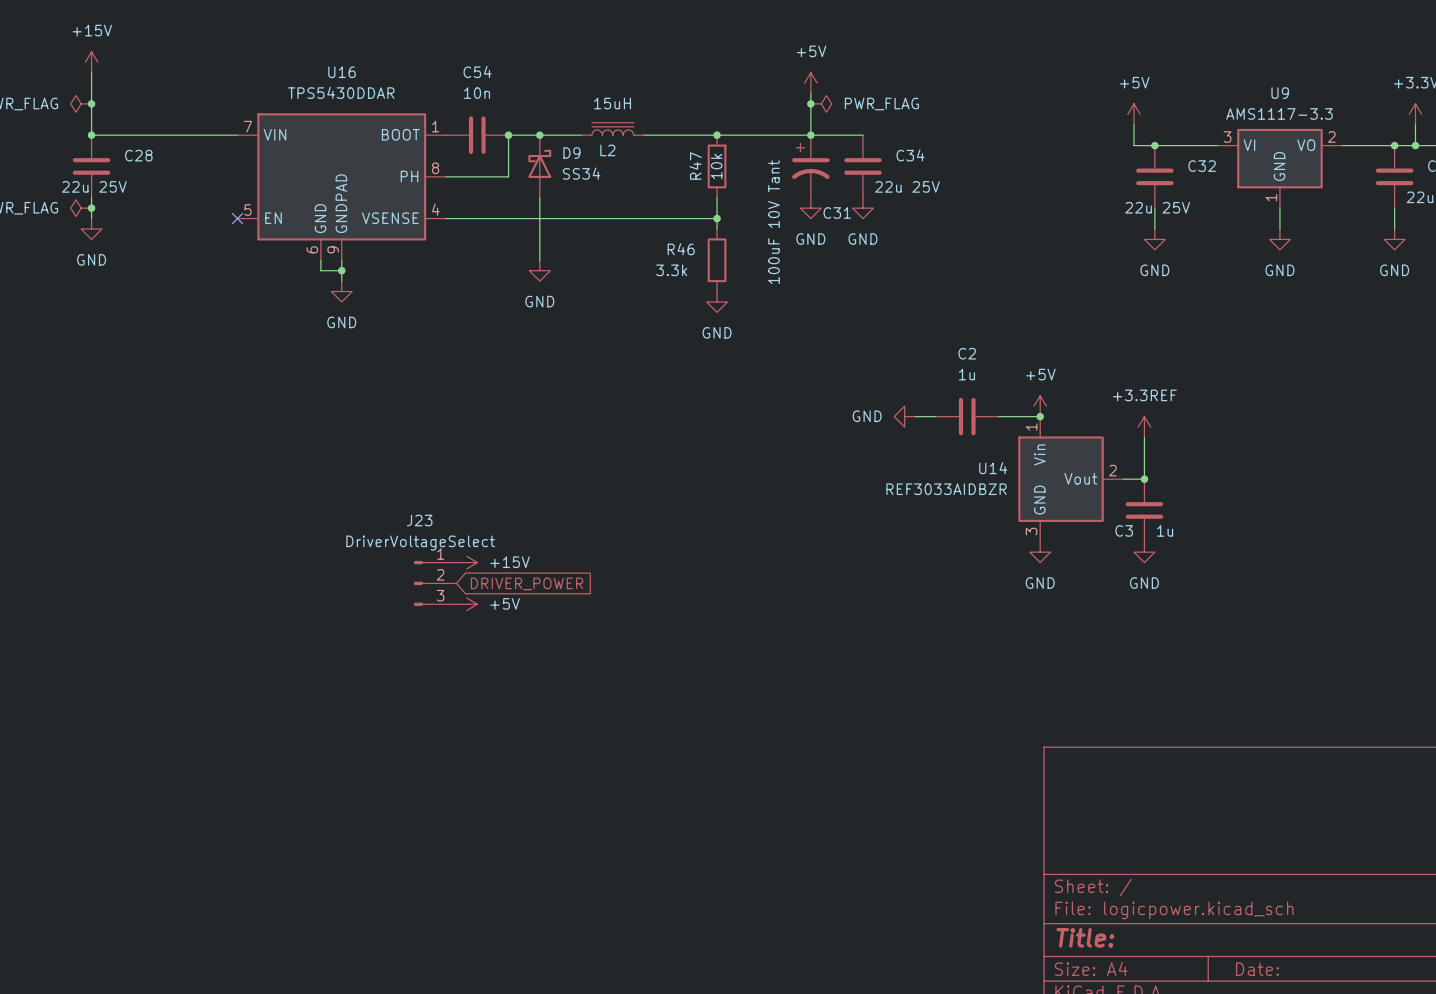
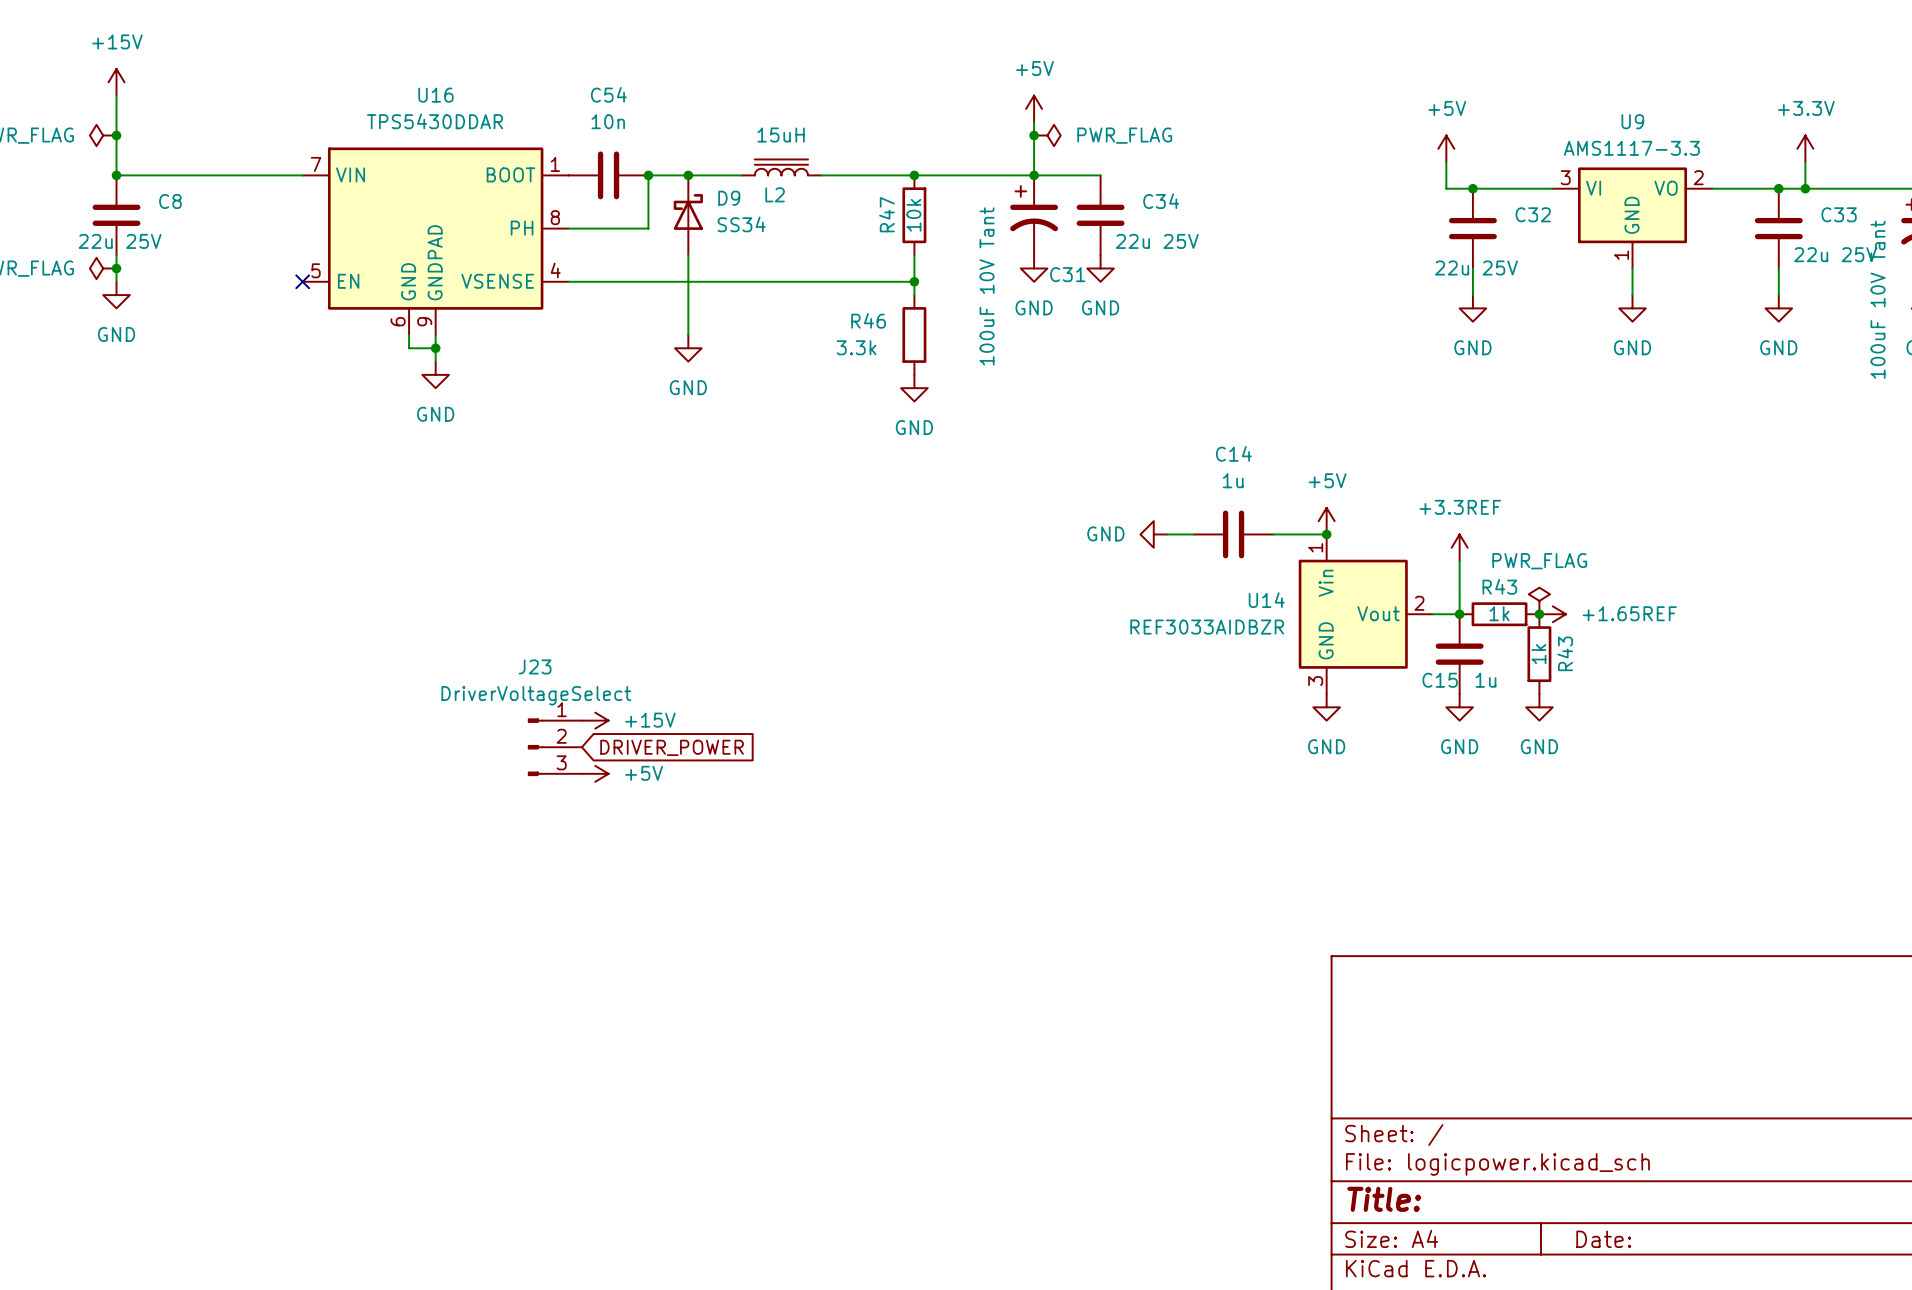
C28 name: C28 (138, 155) -> C8 (170, 201)
C2 name: C2 (967, 353) -> C14 (1233, 453)
power symbol: none -> PWR_FLAG (1539, 600)
R43: none -> 1k (1499, 614)
junction: none -> (1539, 614)
power symbol: none -> +1.65REF (1552, 614)
R43: none -> 1k (1539, 654)
C3 name: C3 (1124, 530) -> C15 (1440, 680)
power symbol: none -> GND (1539, 707)

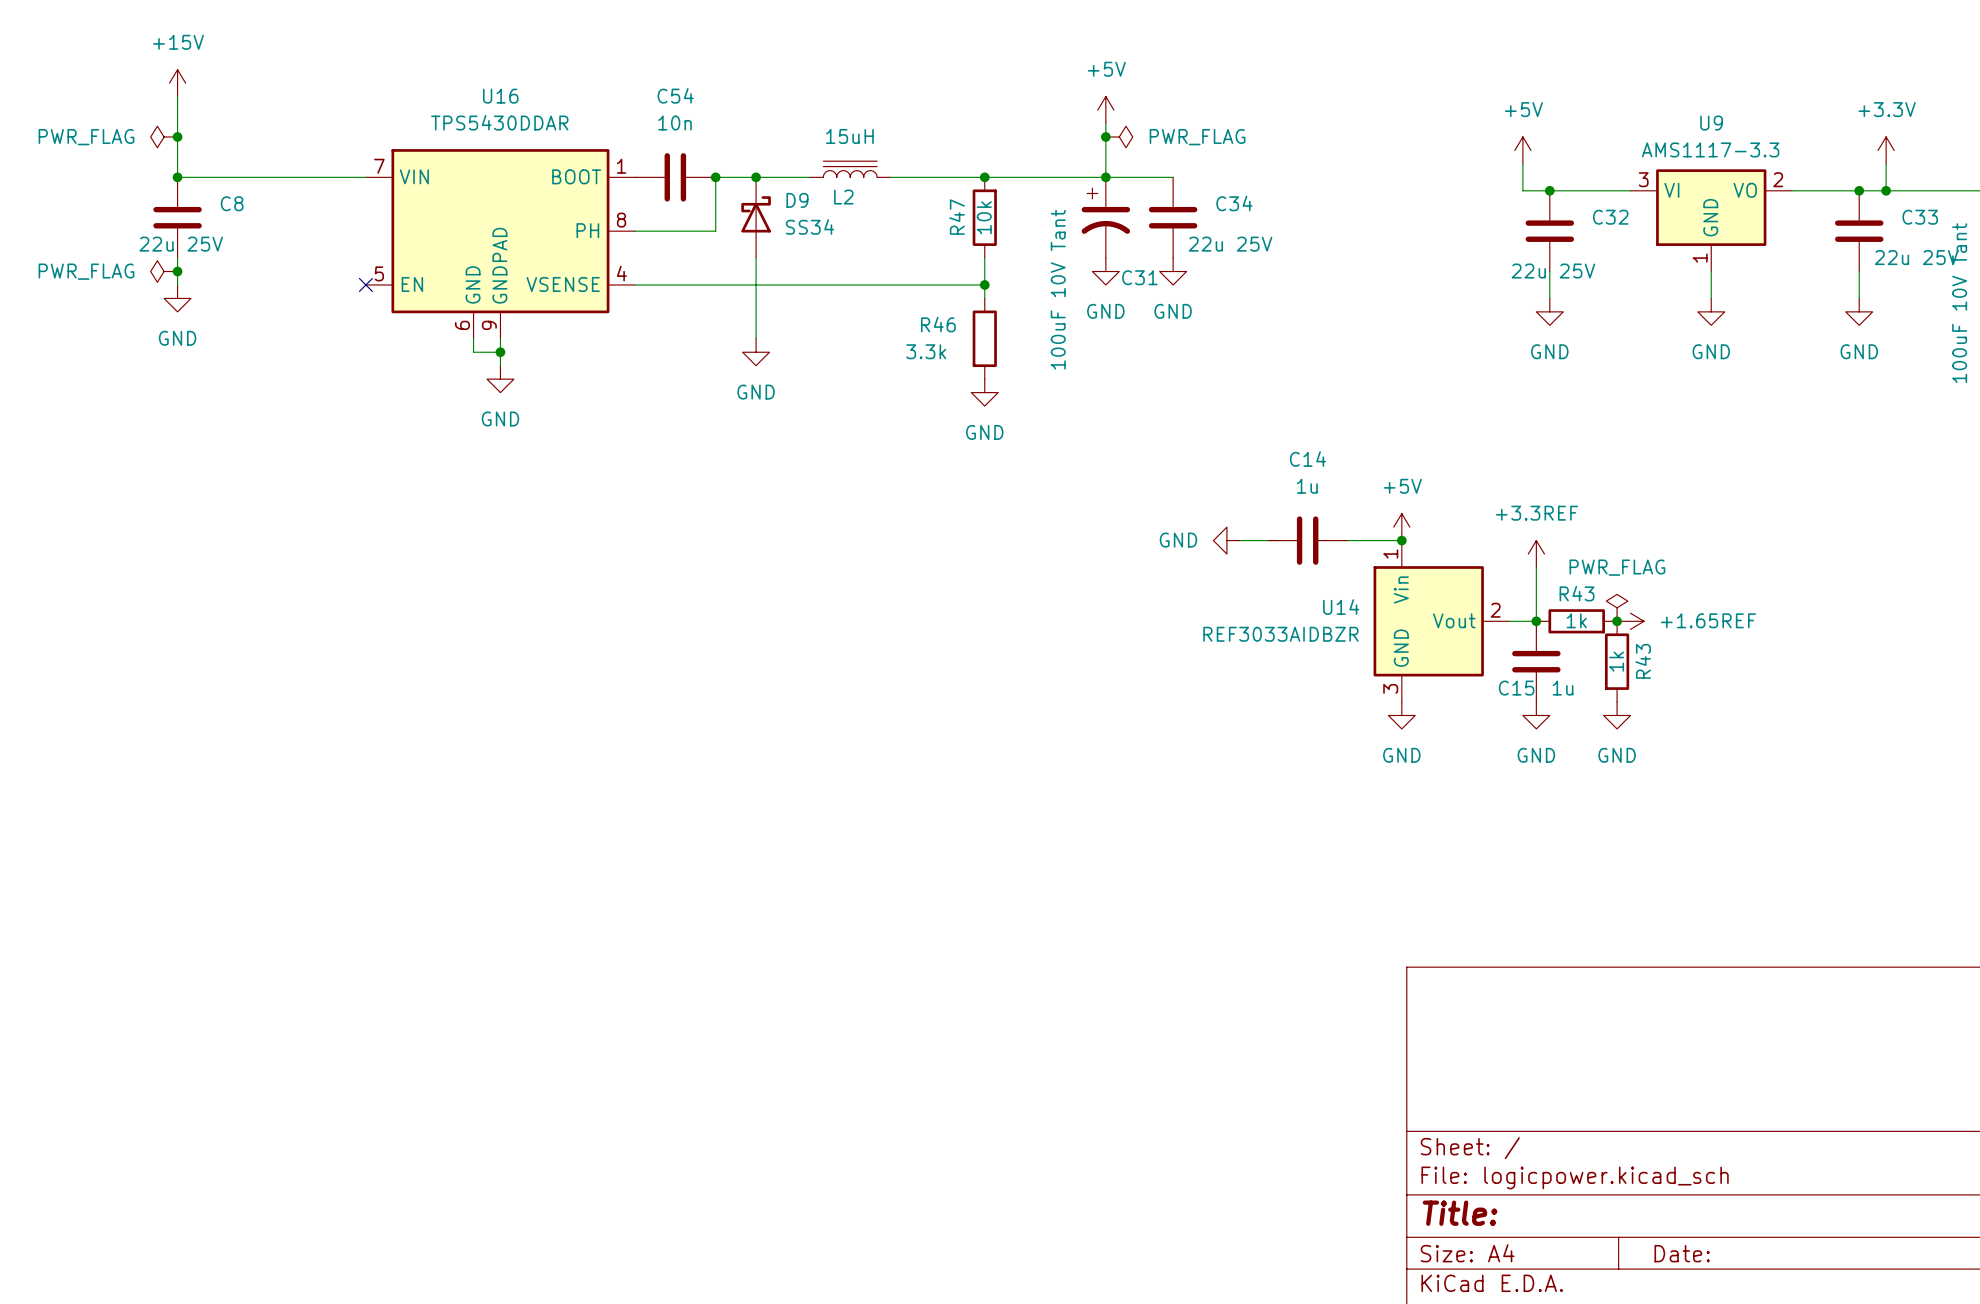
power symbol: +15V (595, 720) -> none
J23: DriverVoltageSelect (554, 747) -> none
global label: DRIVER_POWER (672, 747) -> none
power symbol: +5V (595, 773) -> none

